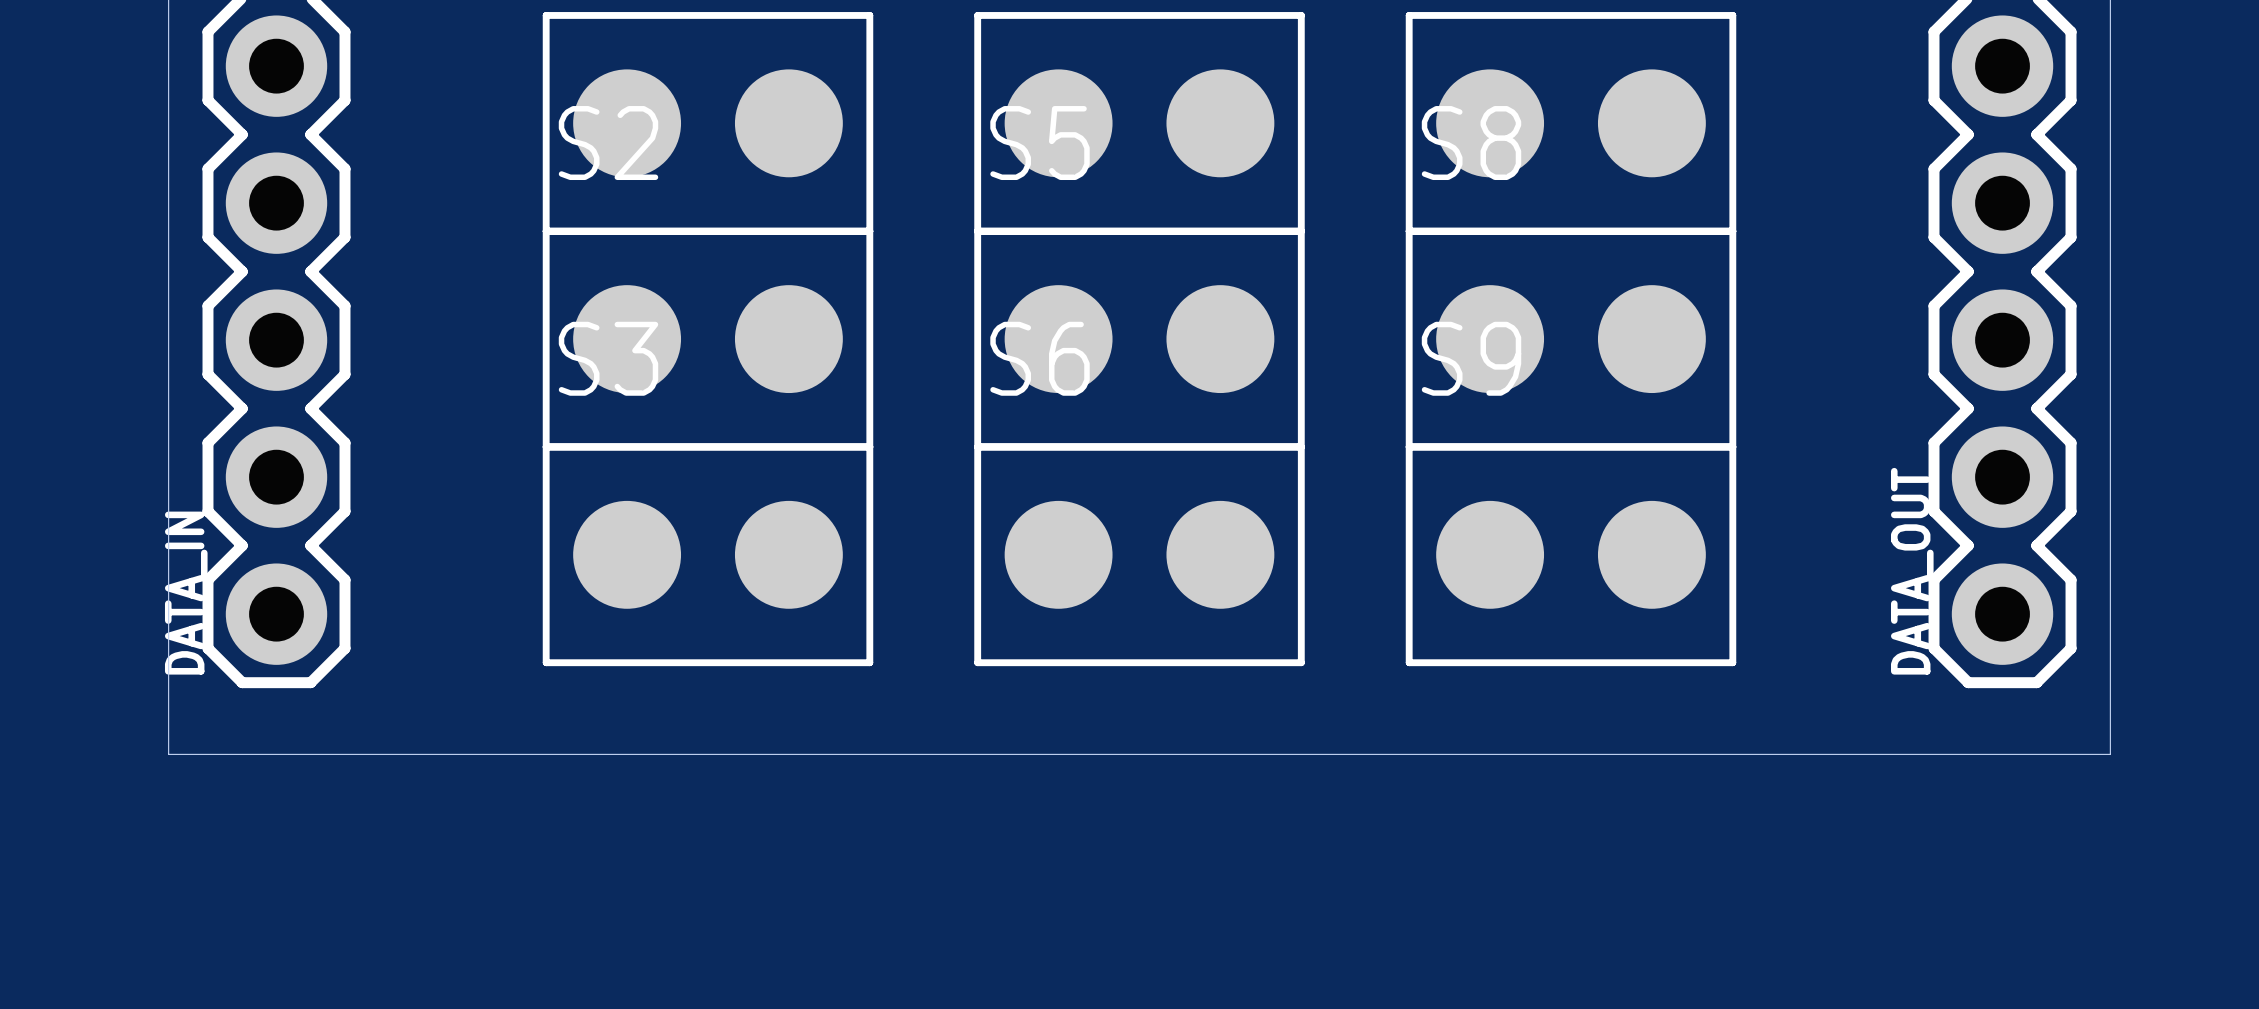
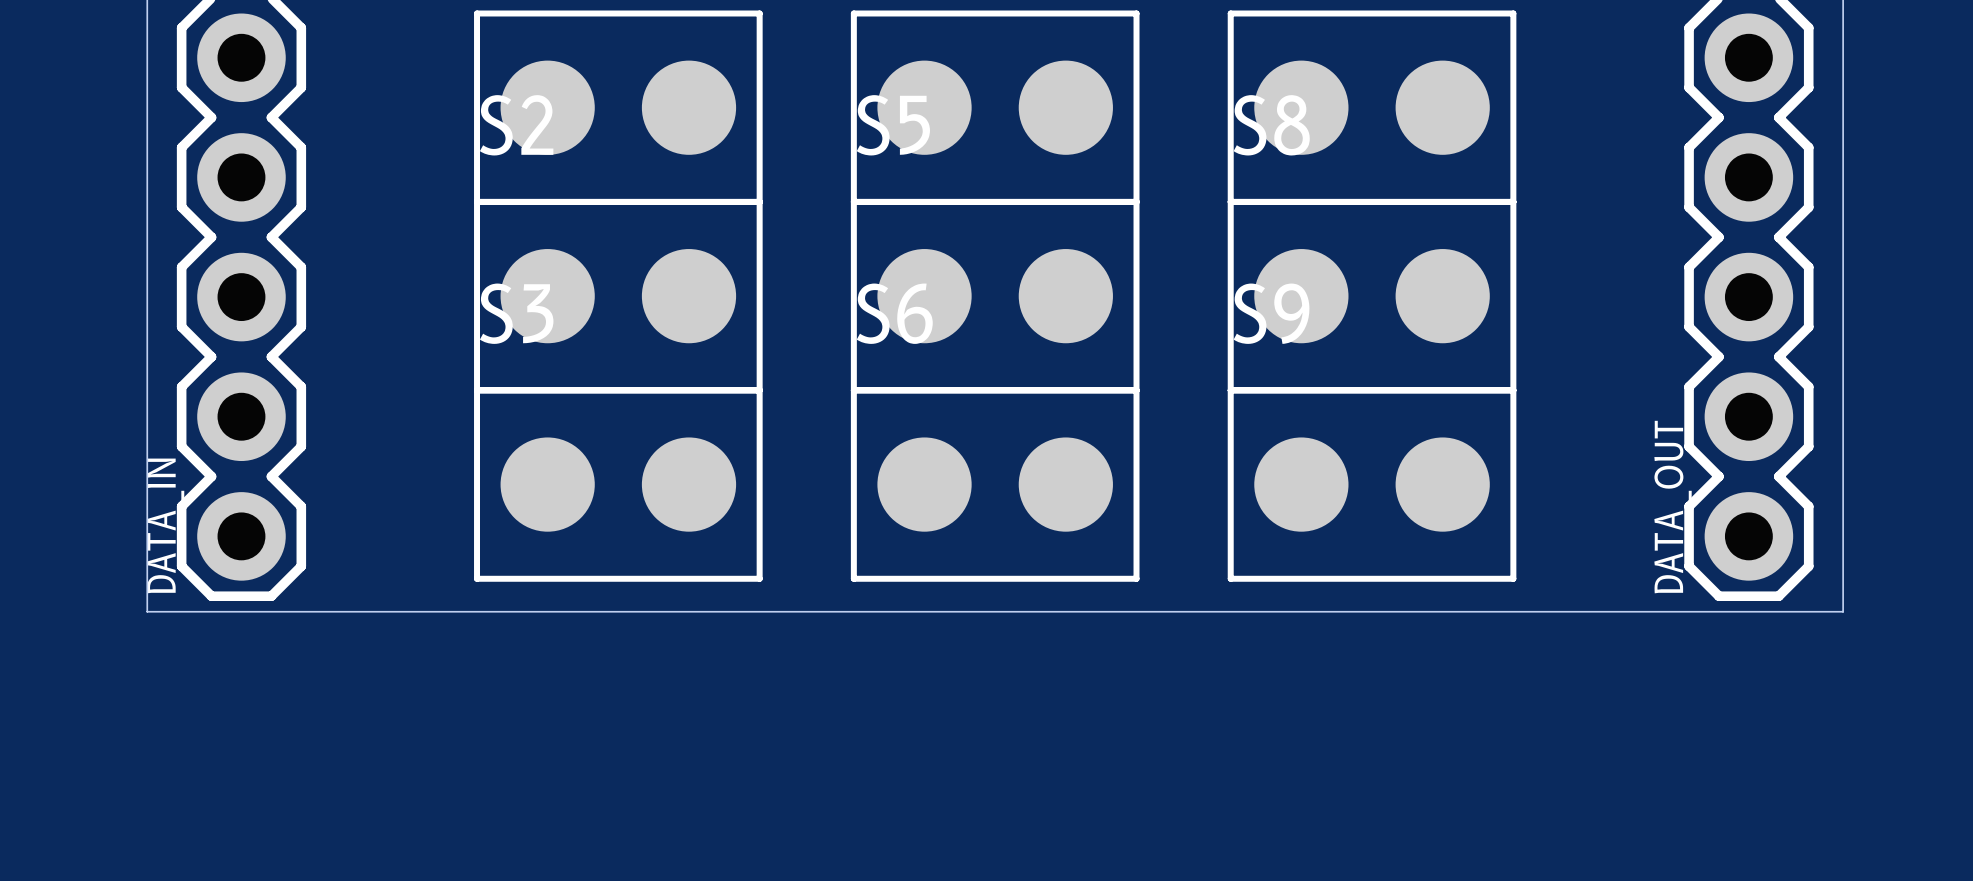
board edge: (168, 700) (168, 754) (2110, 754) (2110, 700) -> (147, 611) (1843, 611)

